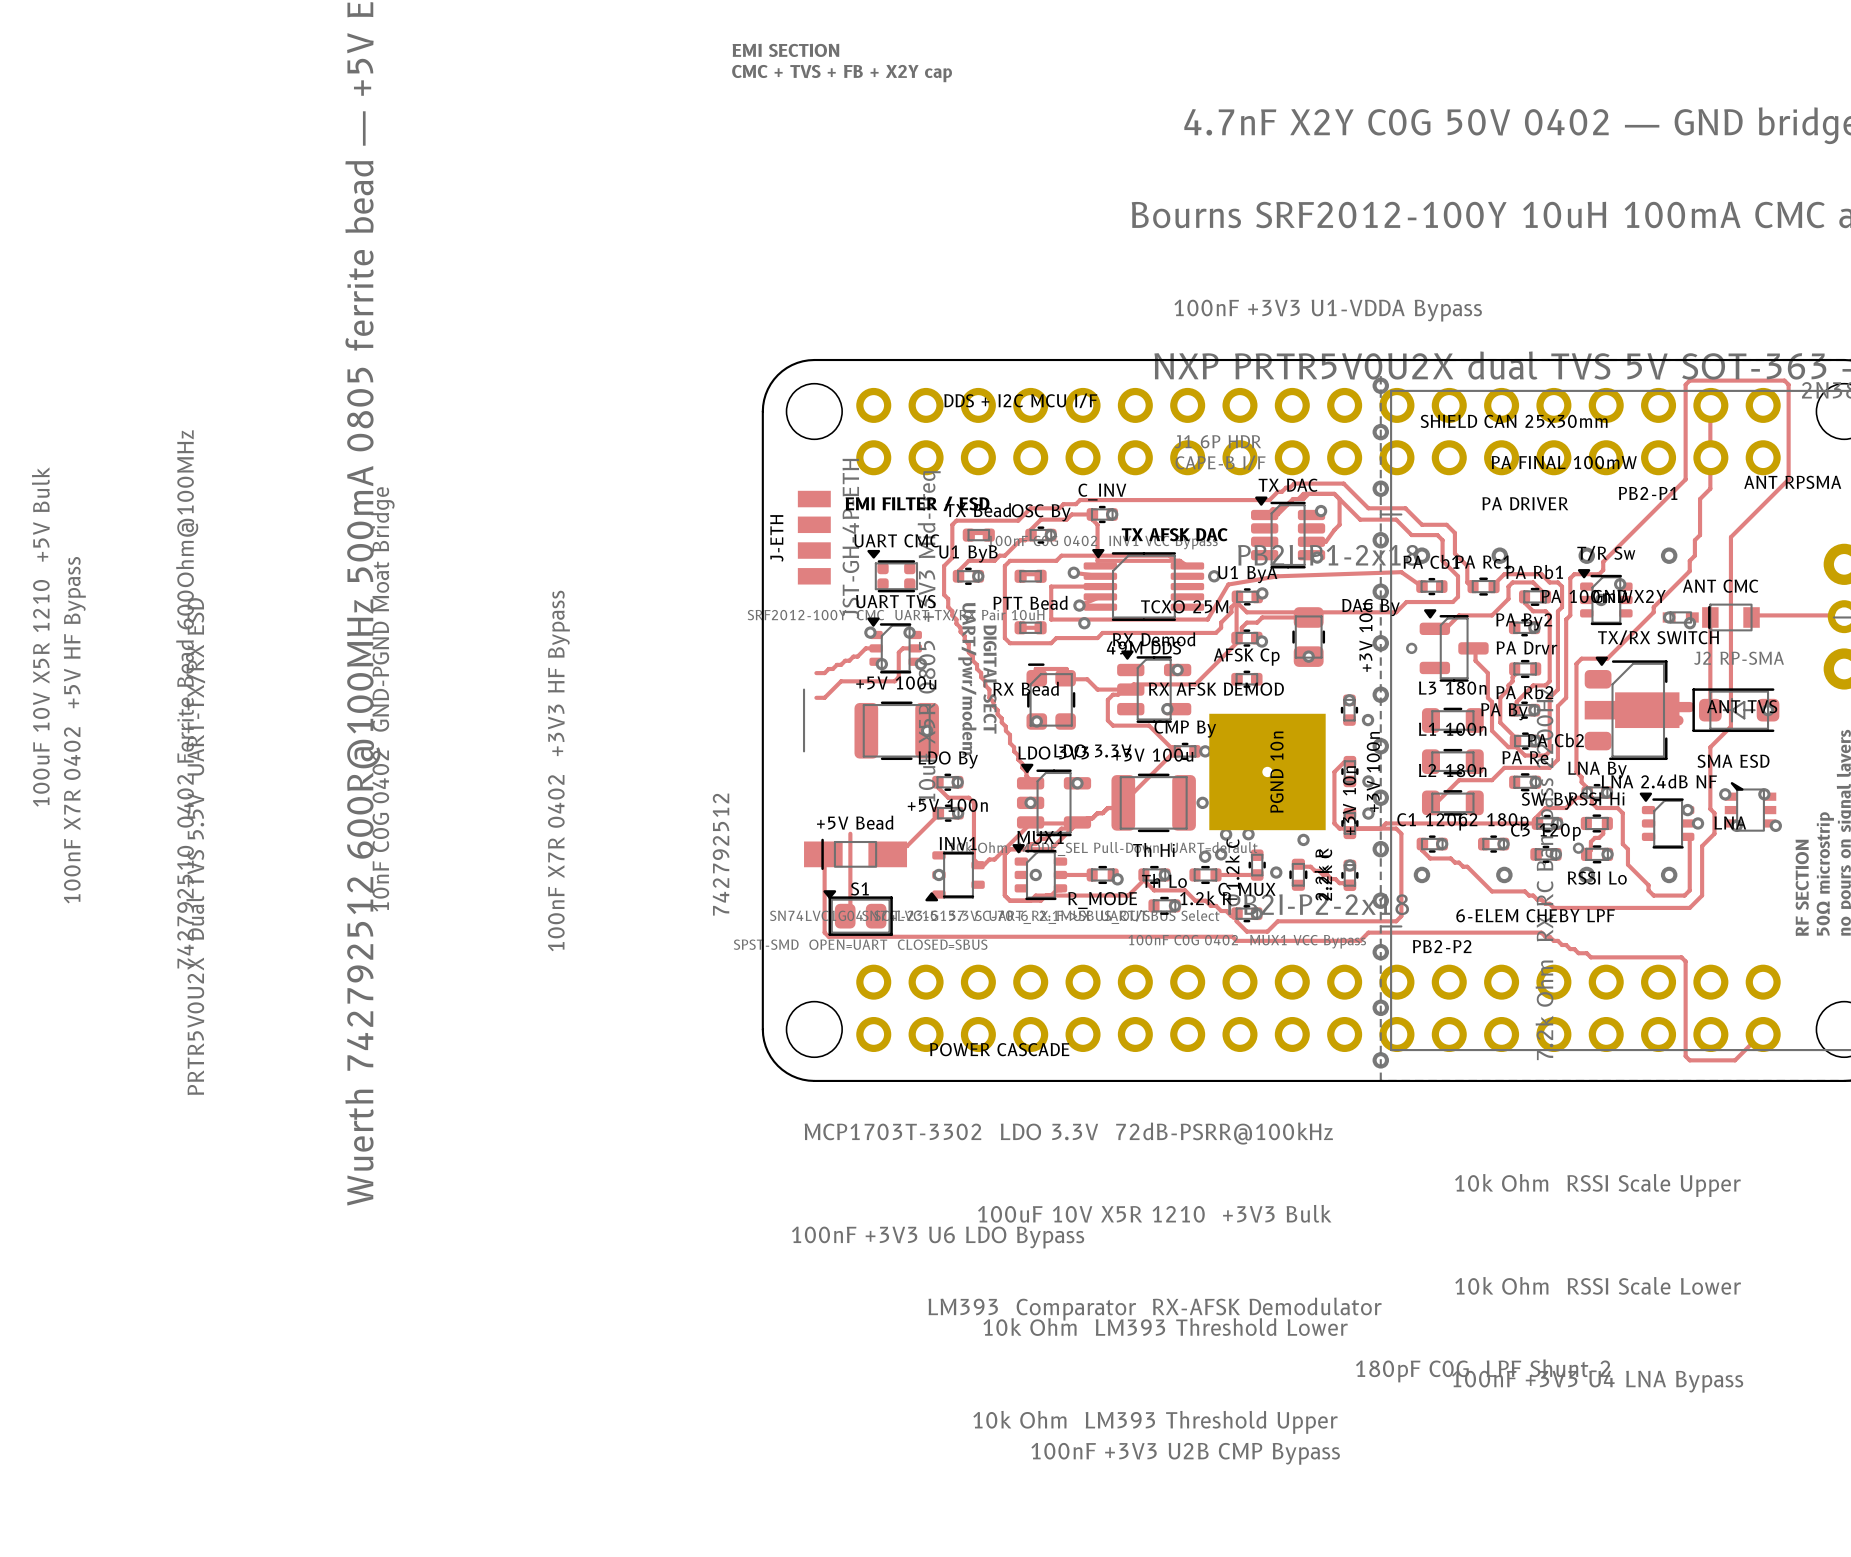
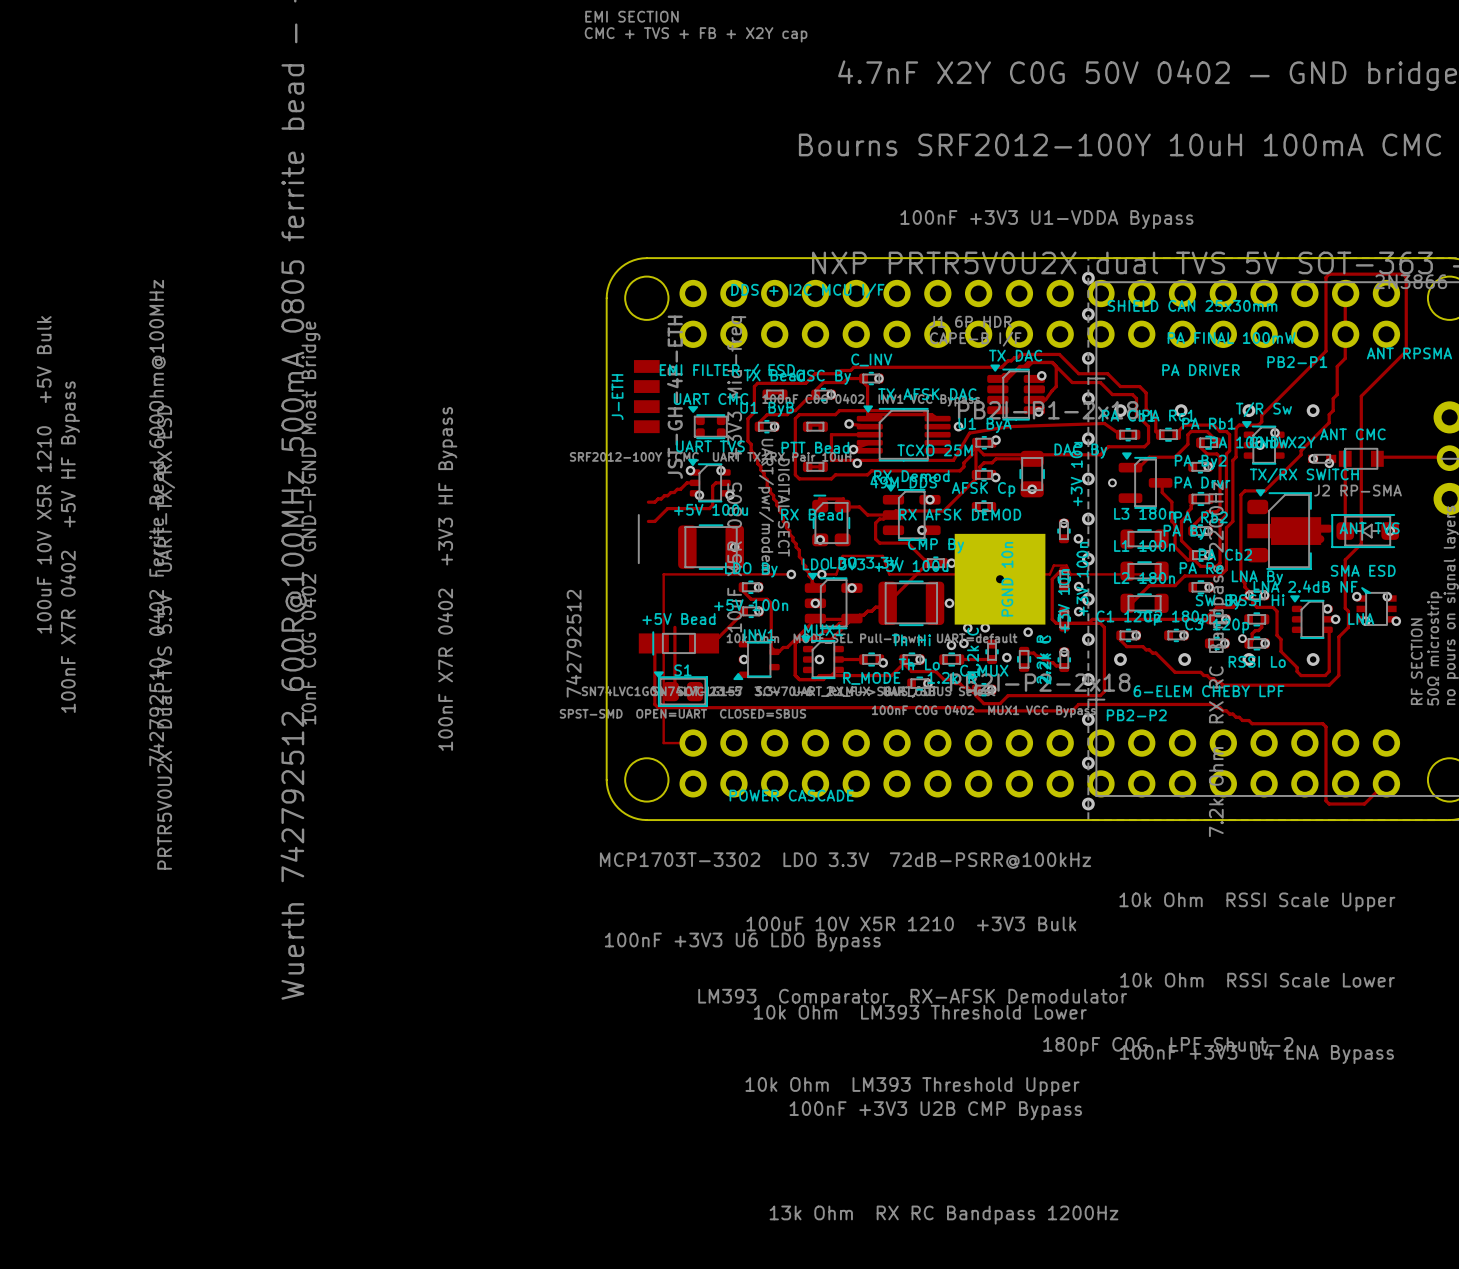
track: none -> (791, 574) (663, 574) (663, 743) (693, 743)
via: none -> (791, 574)
track: none -> (821, 574) (836, 574) (842, 555) (882, 555) (889, 574) (1049, 574) (1053, 565) (1066, 565) (1070, 574) (1143, 574)
via: none -> (821, 574)

